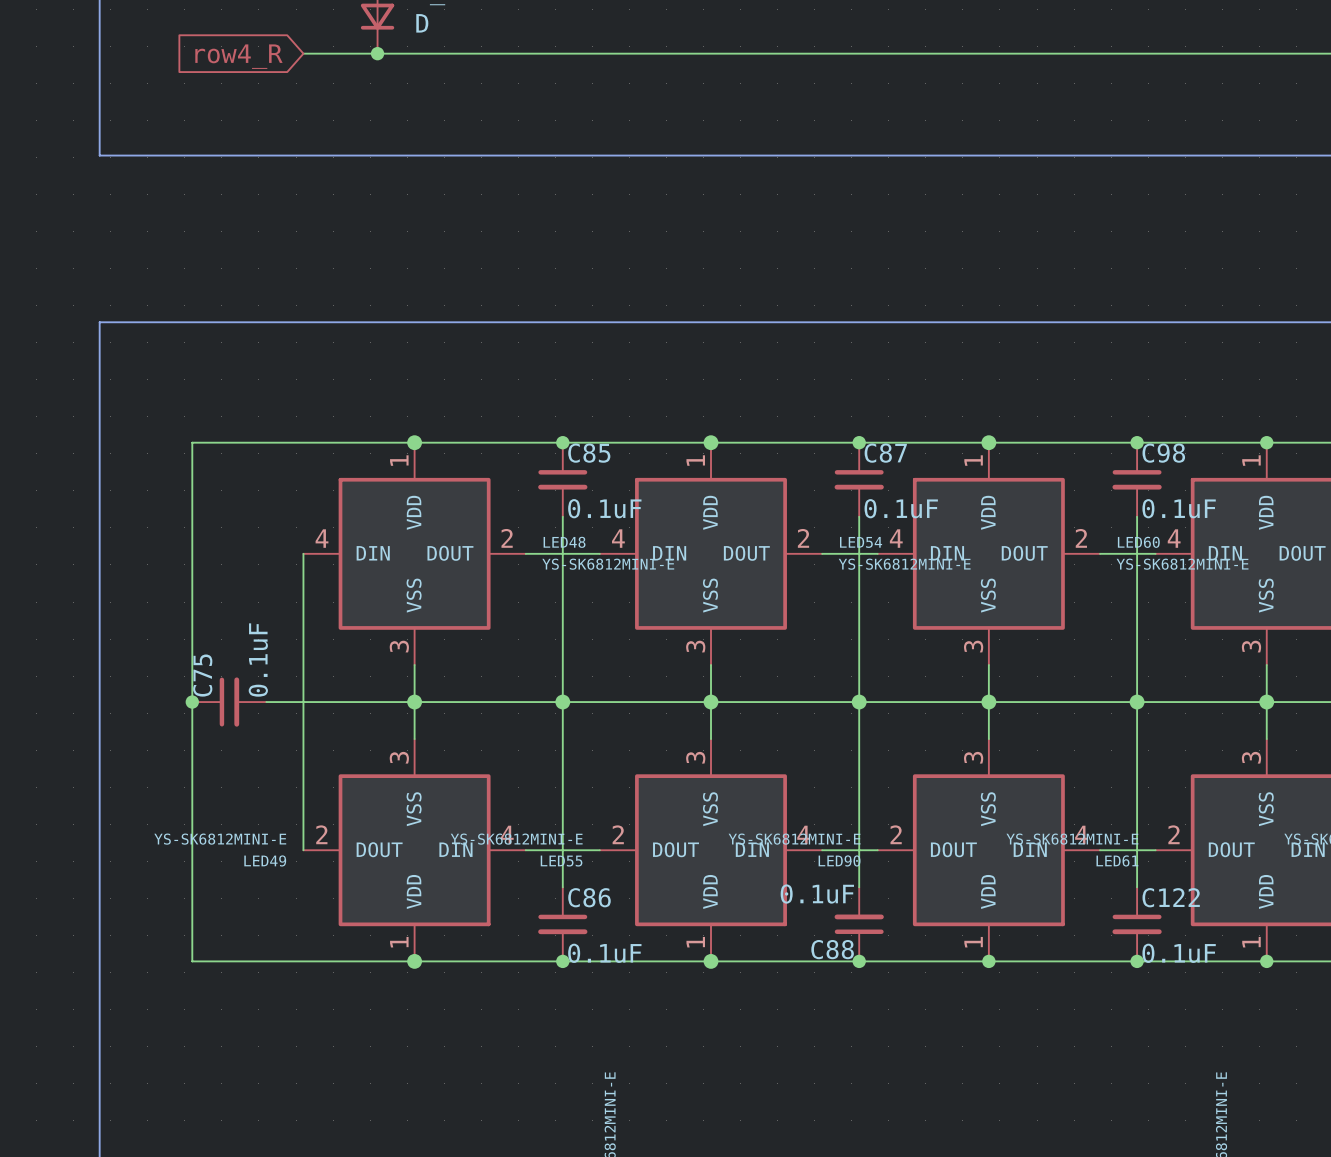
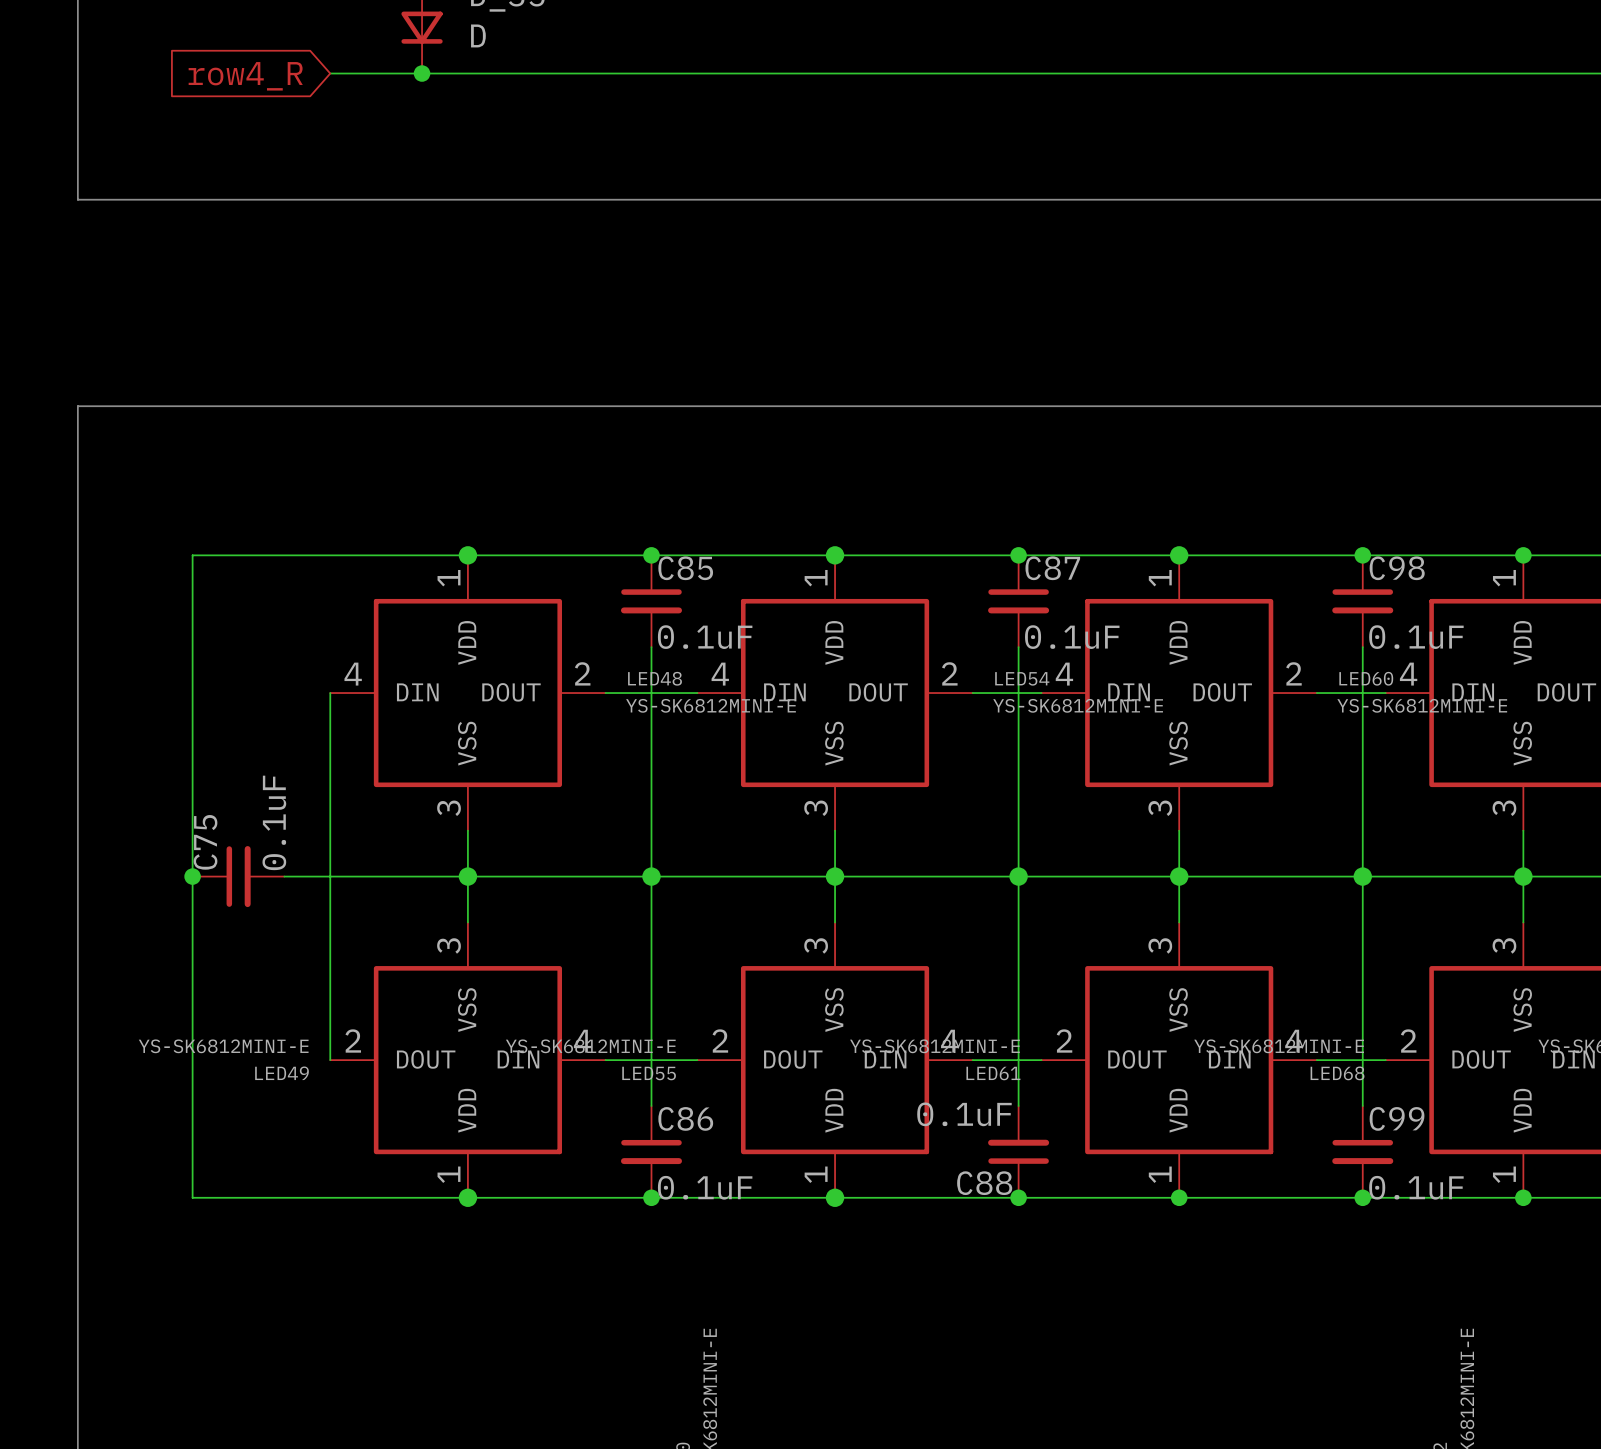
LED90 name: LED90 (839, 860) -> LED61 (993, 1073)
LED61 name: LED61 (1117, 860) -> LED68 (1337, 1073)
C122 name: C122 (1171, 897) -> C99 (1397, 1118)

